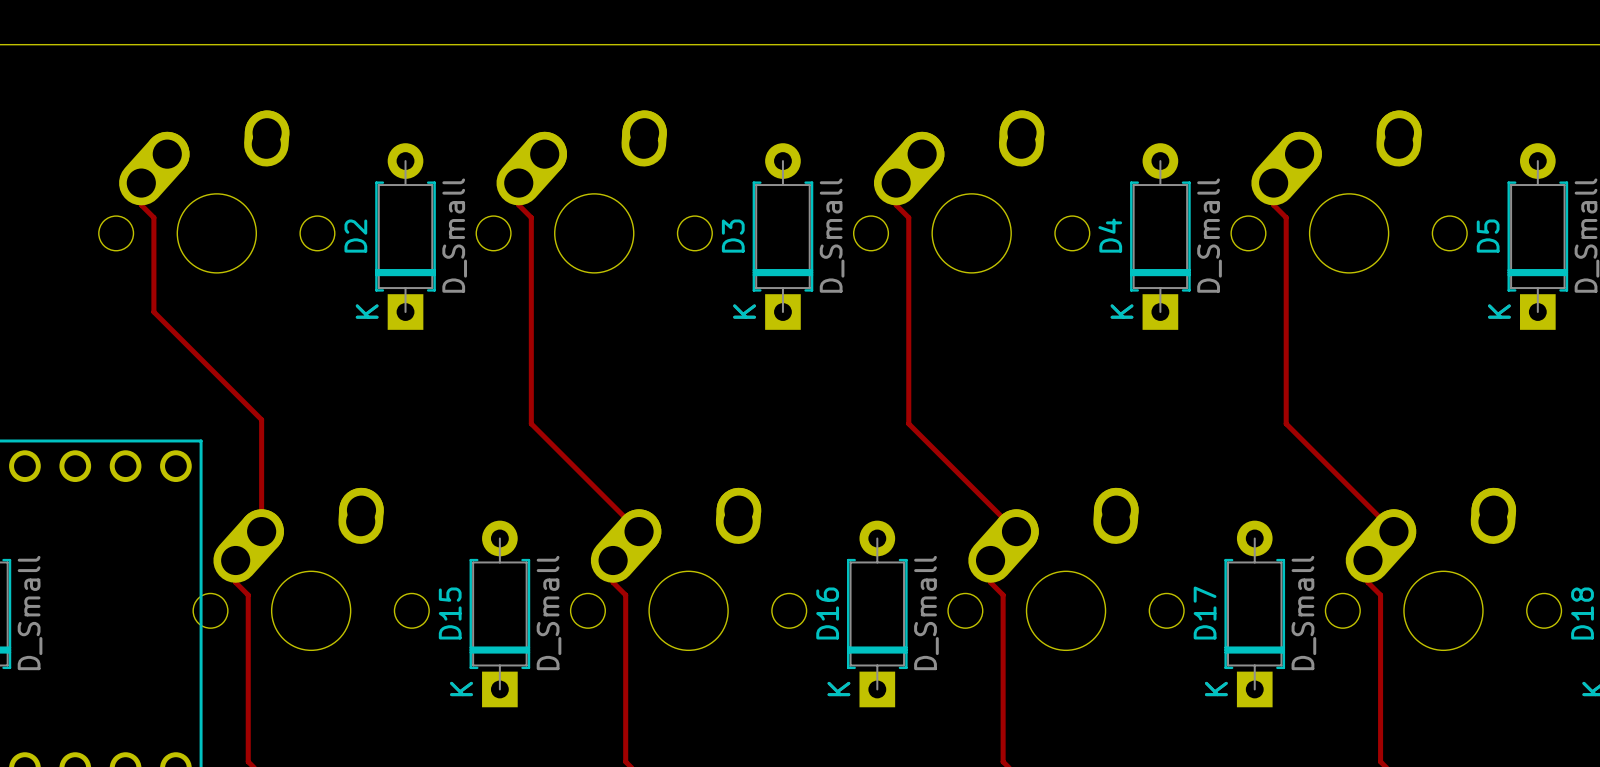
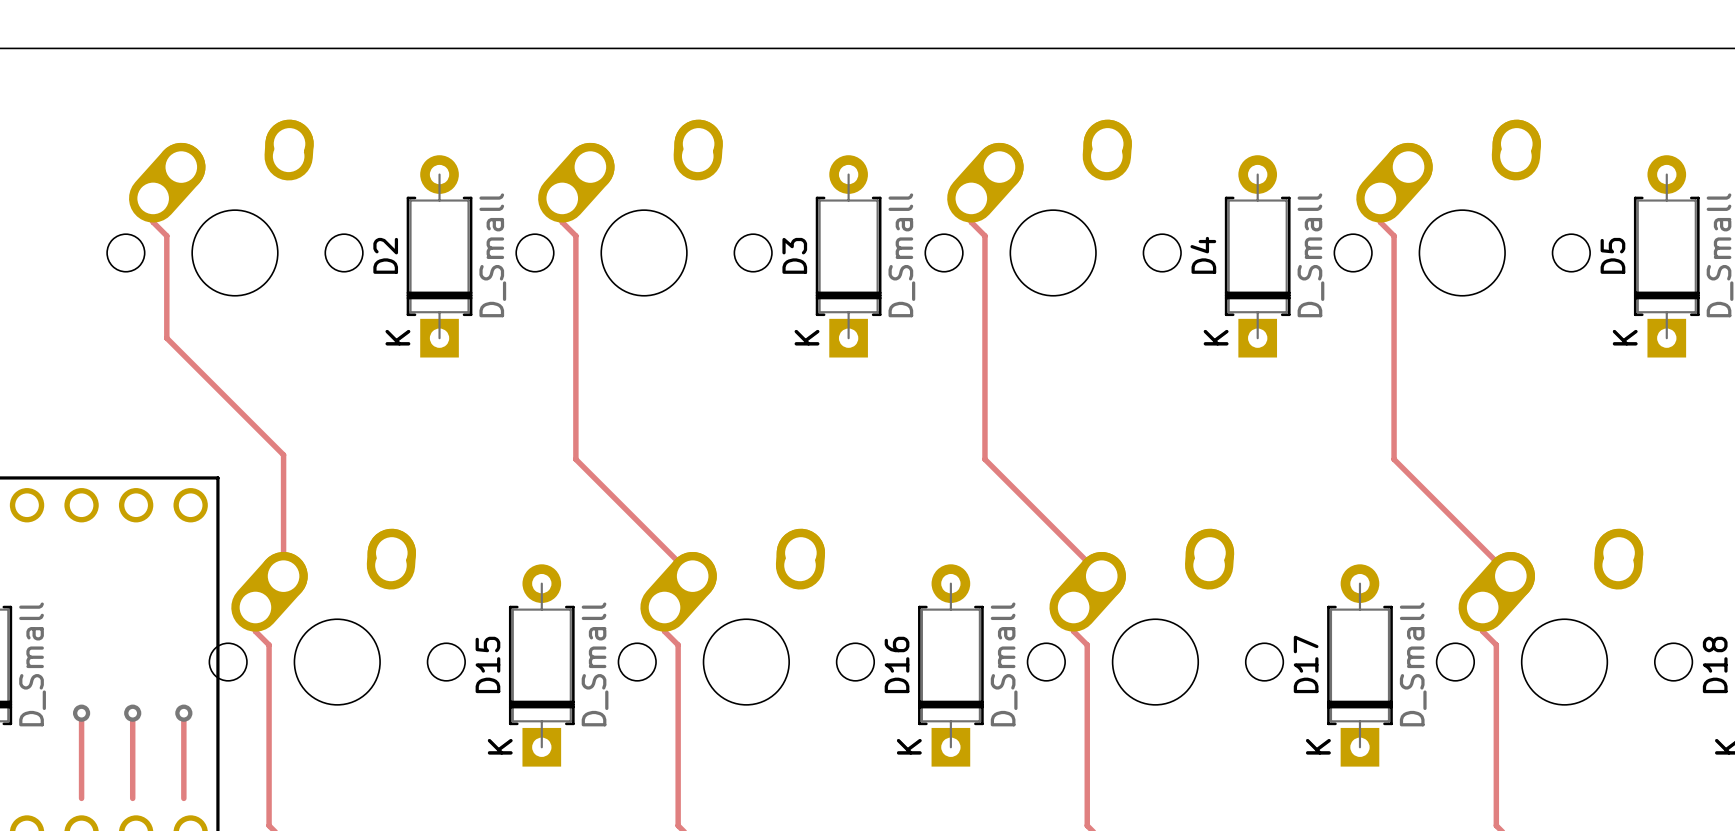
track: none -> (81, 713) (81, 798)
via: none -> (81, 713)
track: none -> (132, 713) (132, 798)
via: none -> (132, 713)
track: none -> (183, 713) (183, 798)
via: none -> (183, 713)

